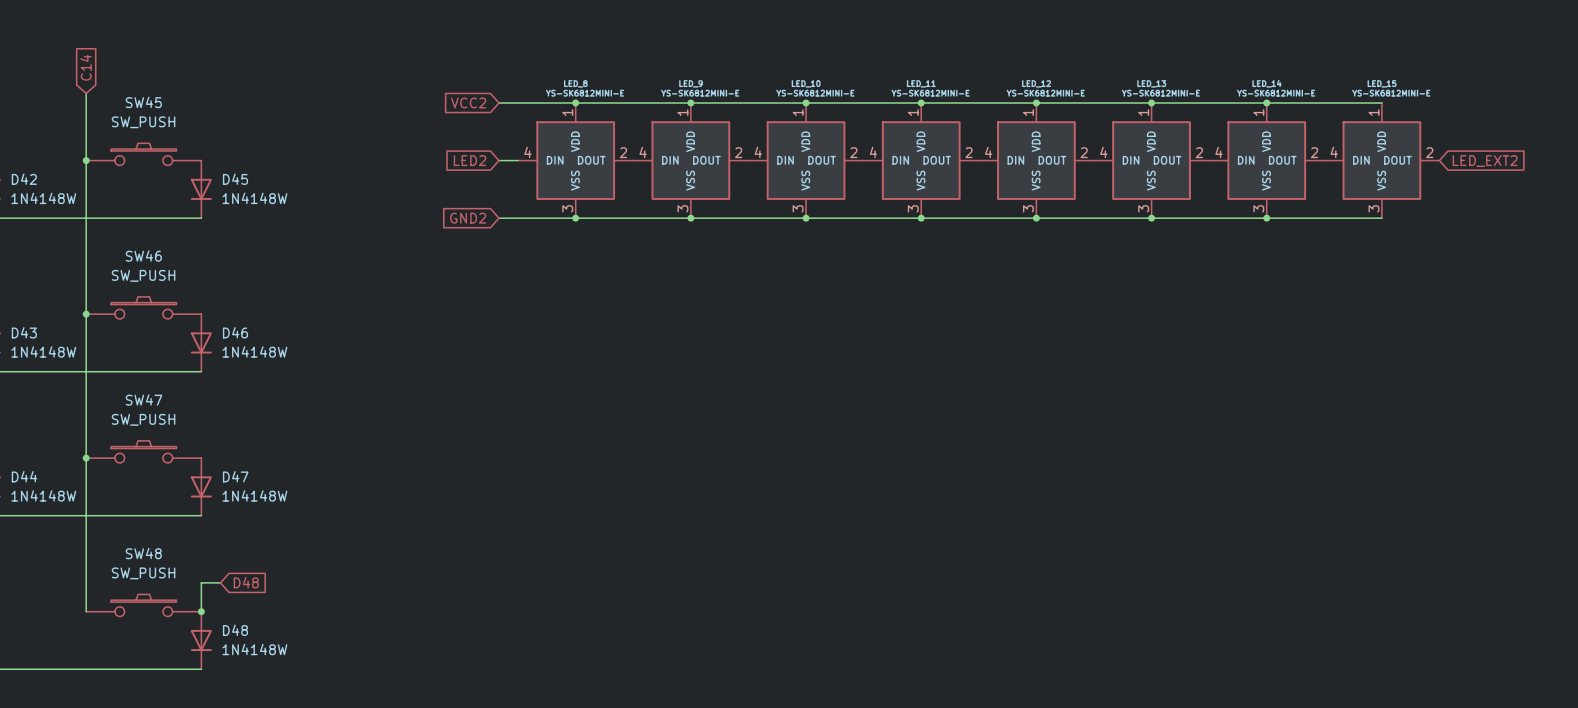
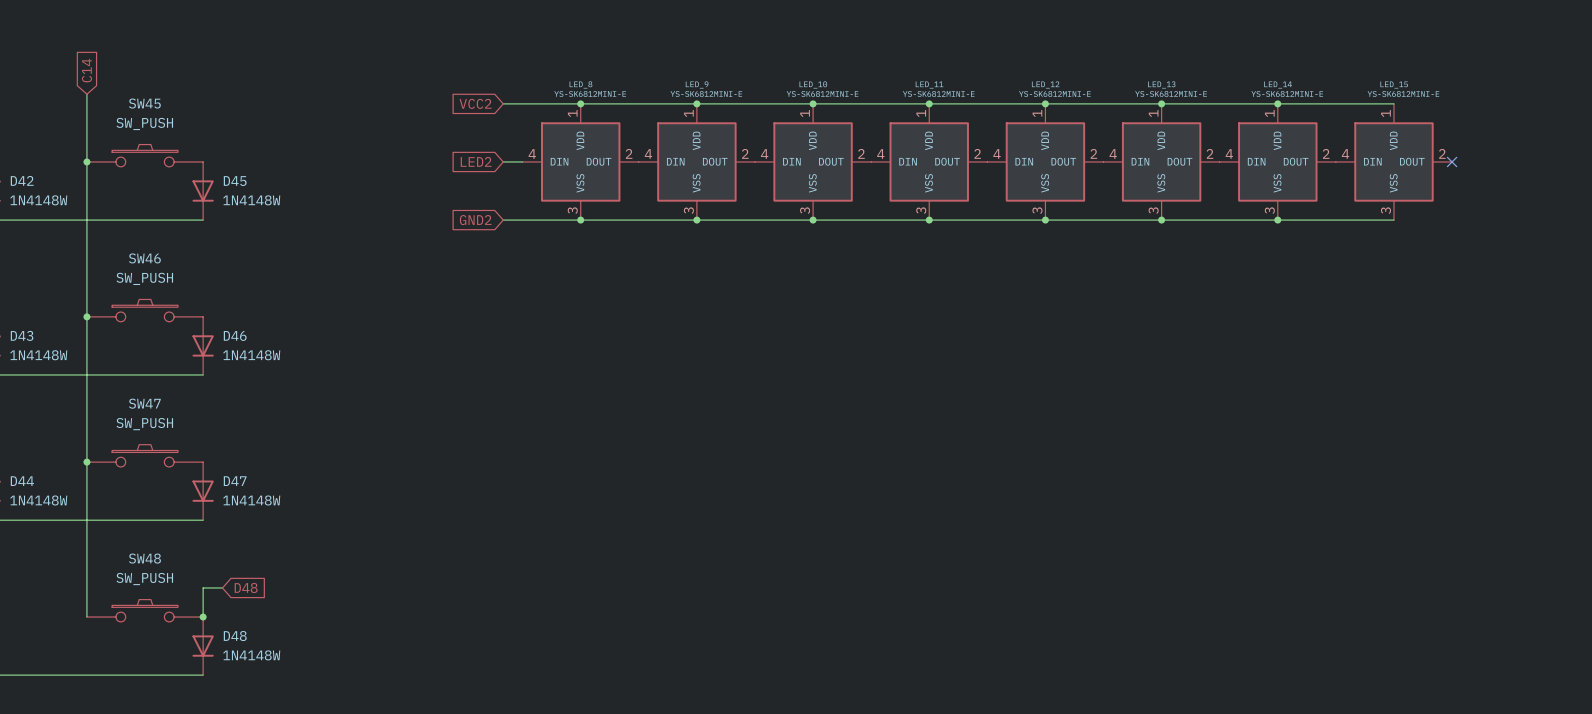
no-connect mark: none -> (1452, 161)
global label: LED_EXT2 (1485, 161) -> none

